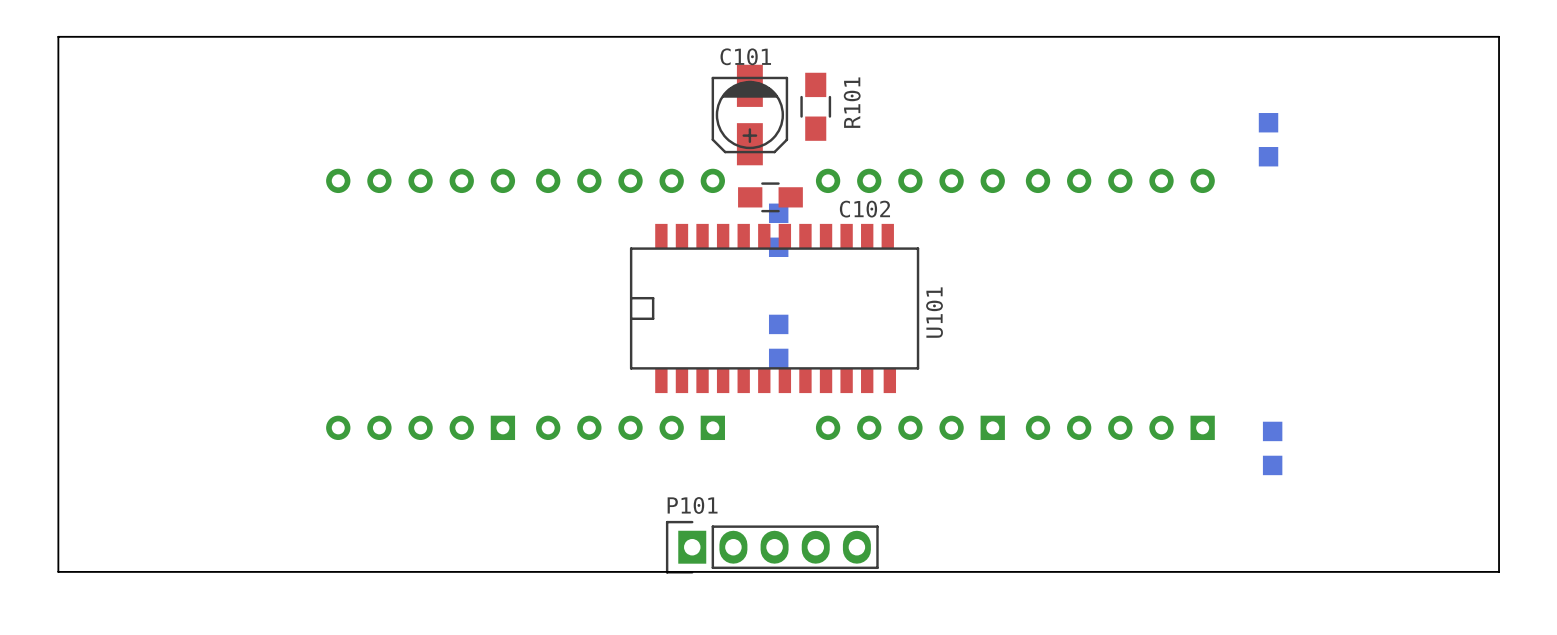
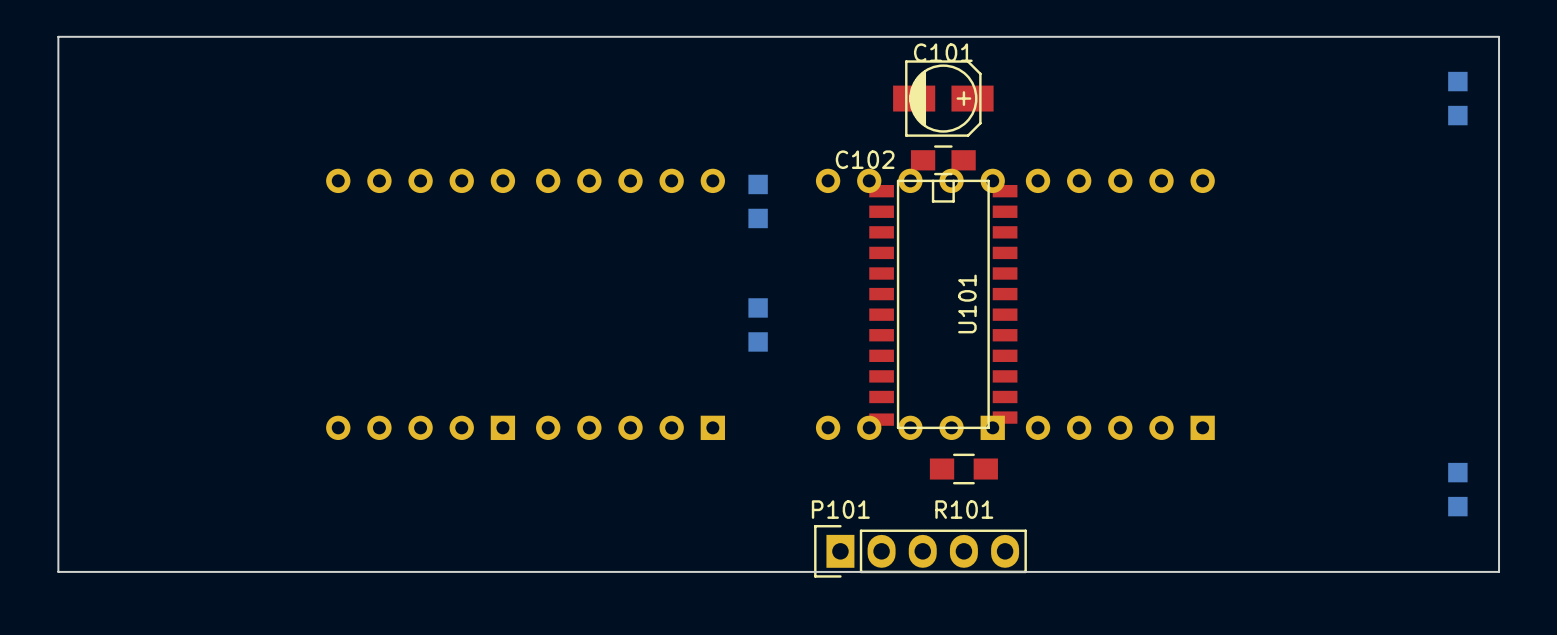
R101 rotation: 0° (815, 106) -> 90° clockwise (963, 469)
R101 position: (815, 106) -> (963, 469)
C101 rotation: 0° (749, 115) -> 90° counterclockwise (943, 98)
C101 position: (749, 115) -> (943, 98)
part position: (1268, 139) -> (1457, 98)
C102 position: (770, 197) -> (943, 160)
C102 name position: C102 (864, 209) -> C102 (865, 159)
U101 footprint: [629, 223, 920, 394] -> [869, 179, 1018, 430]
part position: (778, 230) -> (758, 201)
U101 name position: U101 (934, 312) -> U101 (967, 303)
part position: (778, 341) -> (758, 324)
part position: (1272, 448) -> (1457, 489)
P101 position: (772, 547) -> (920, 551)

